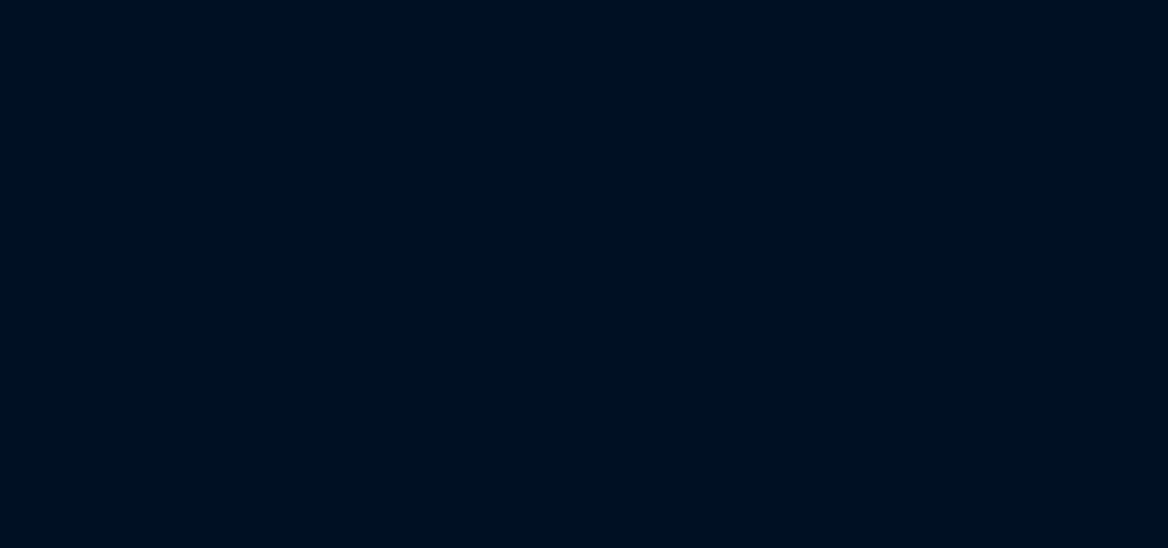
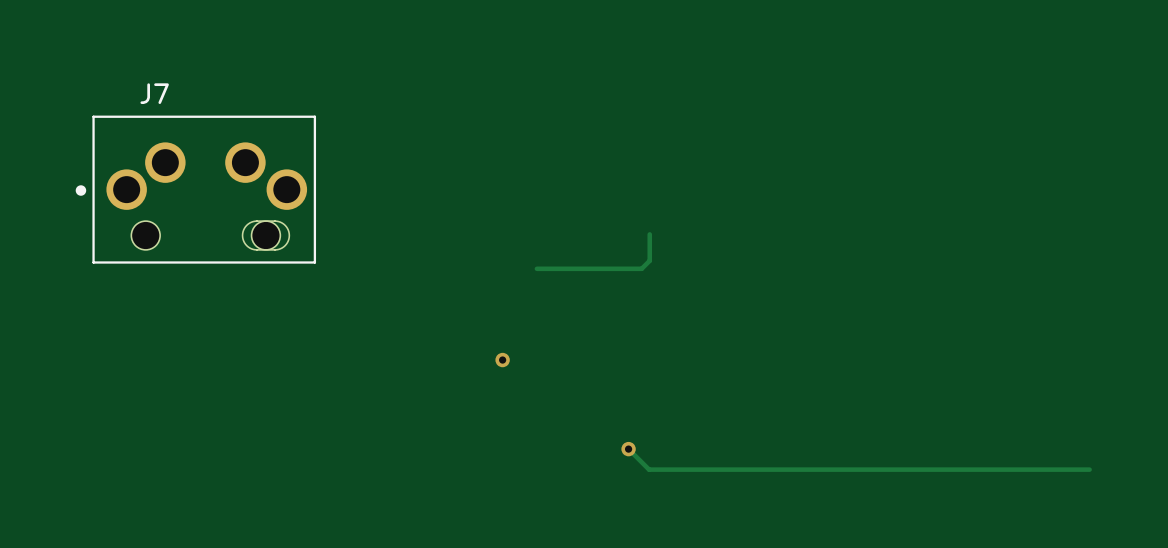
J7: none -> (195, 189)
track: none -> (649, 234) (649, 260) (641, 268) (536, 268)
via: none -> (502, 360)
track: none -> (628, 449) (649, 469) (1089, 469)
via: none -> (628, 449)

